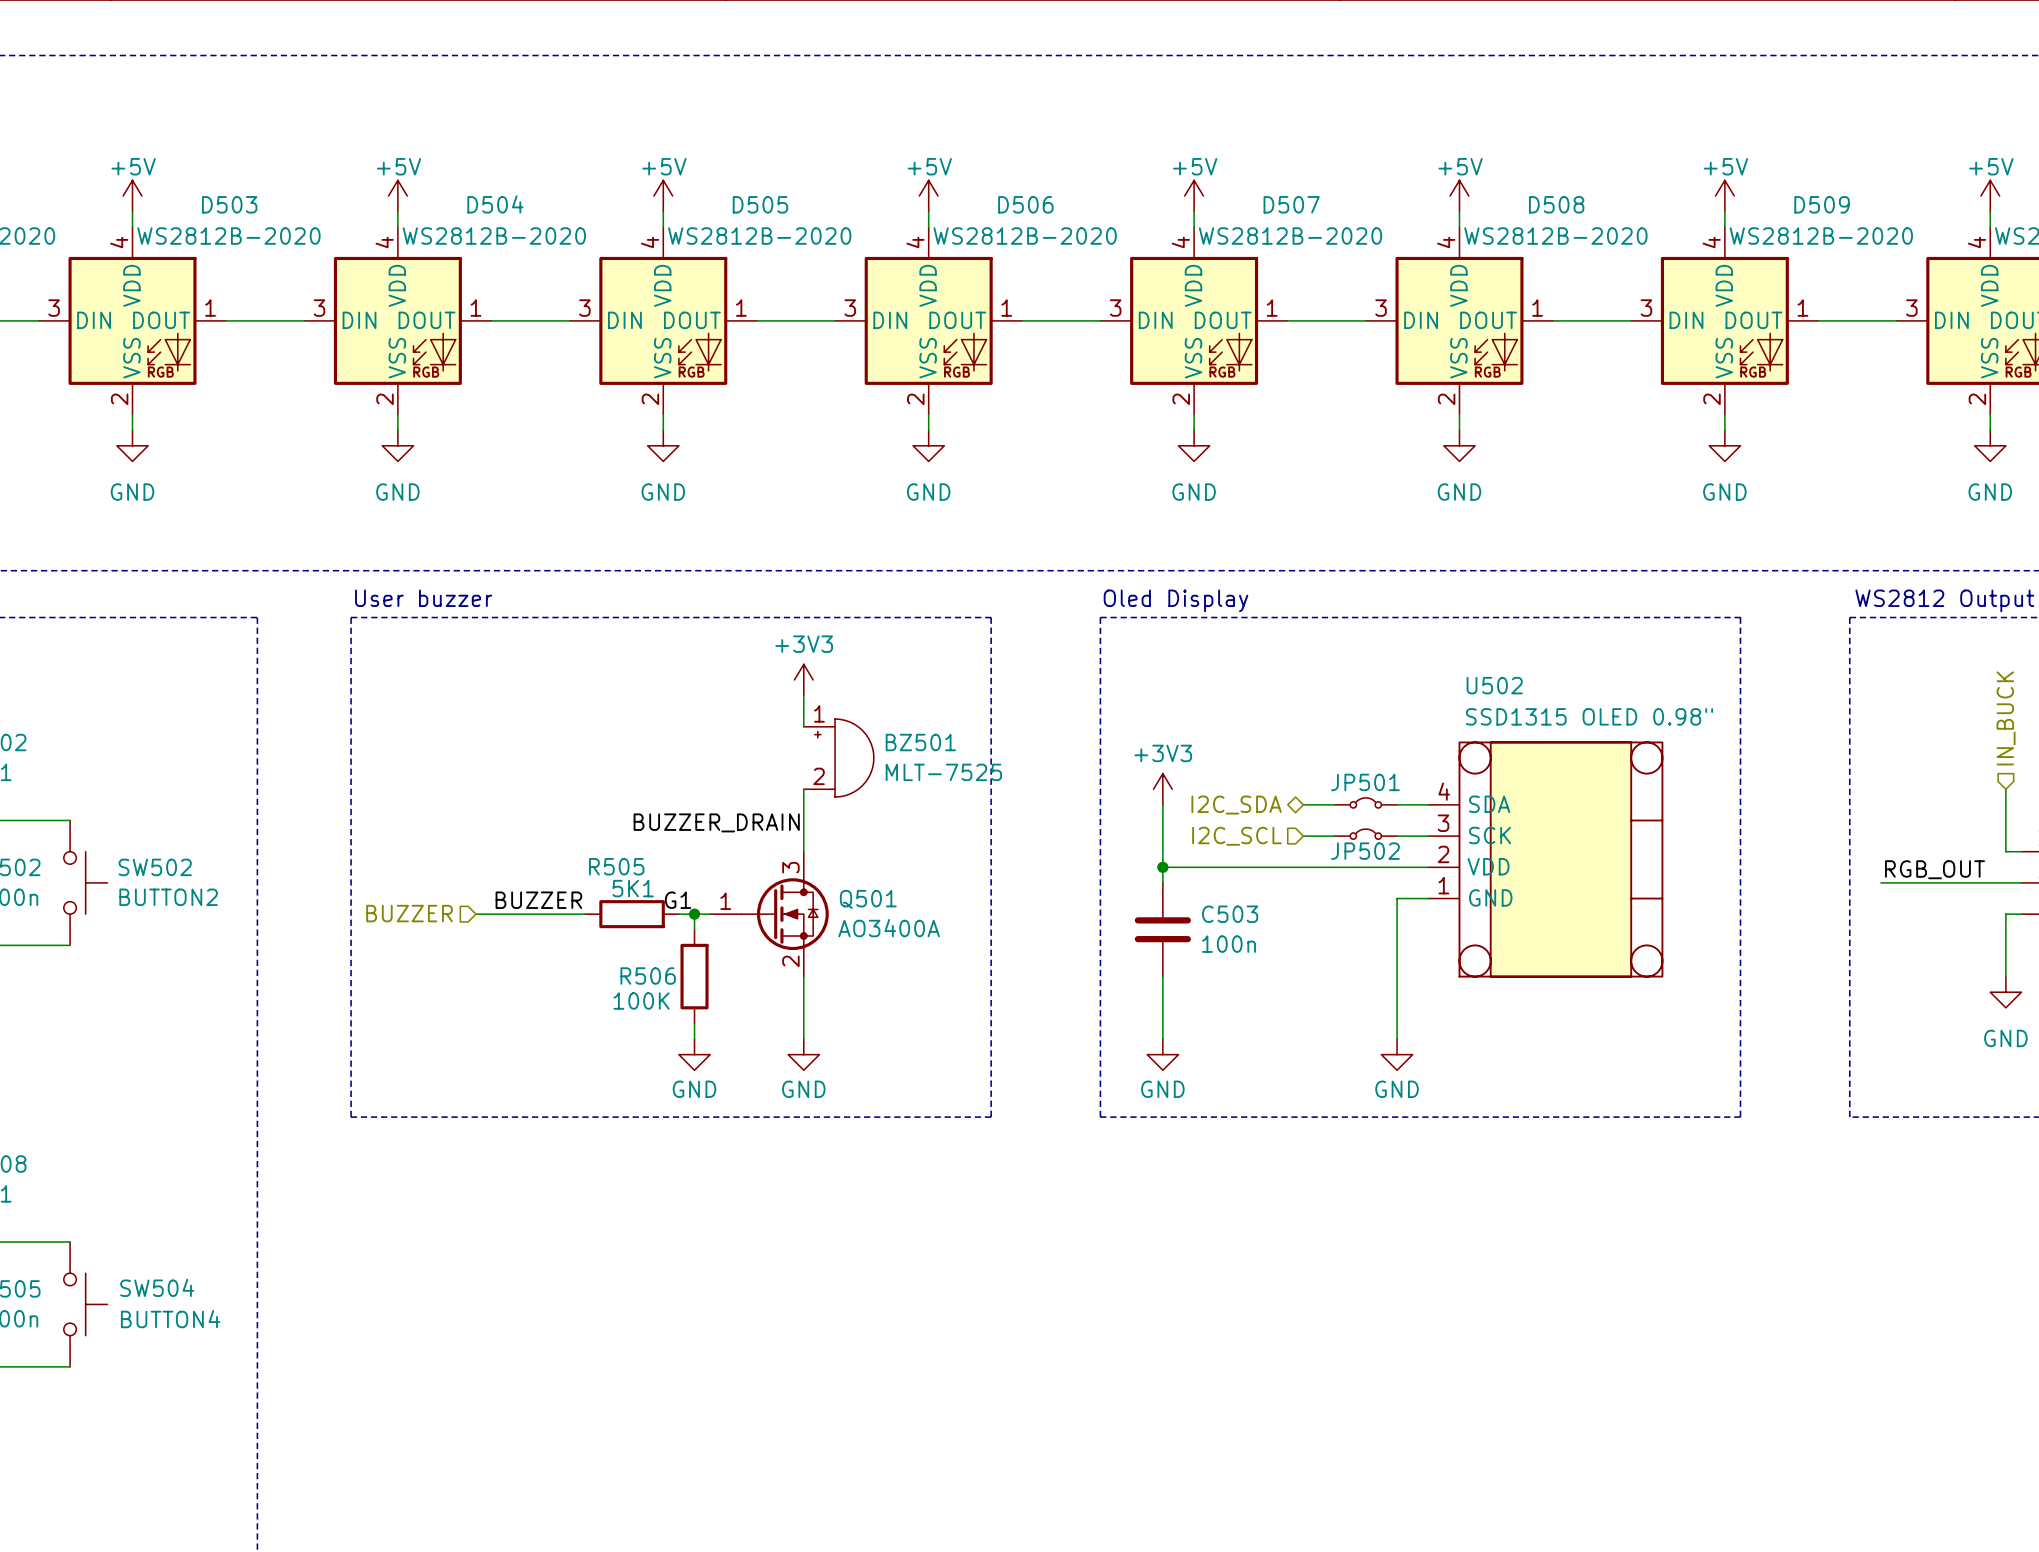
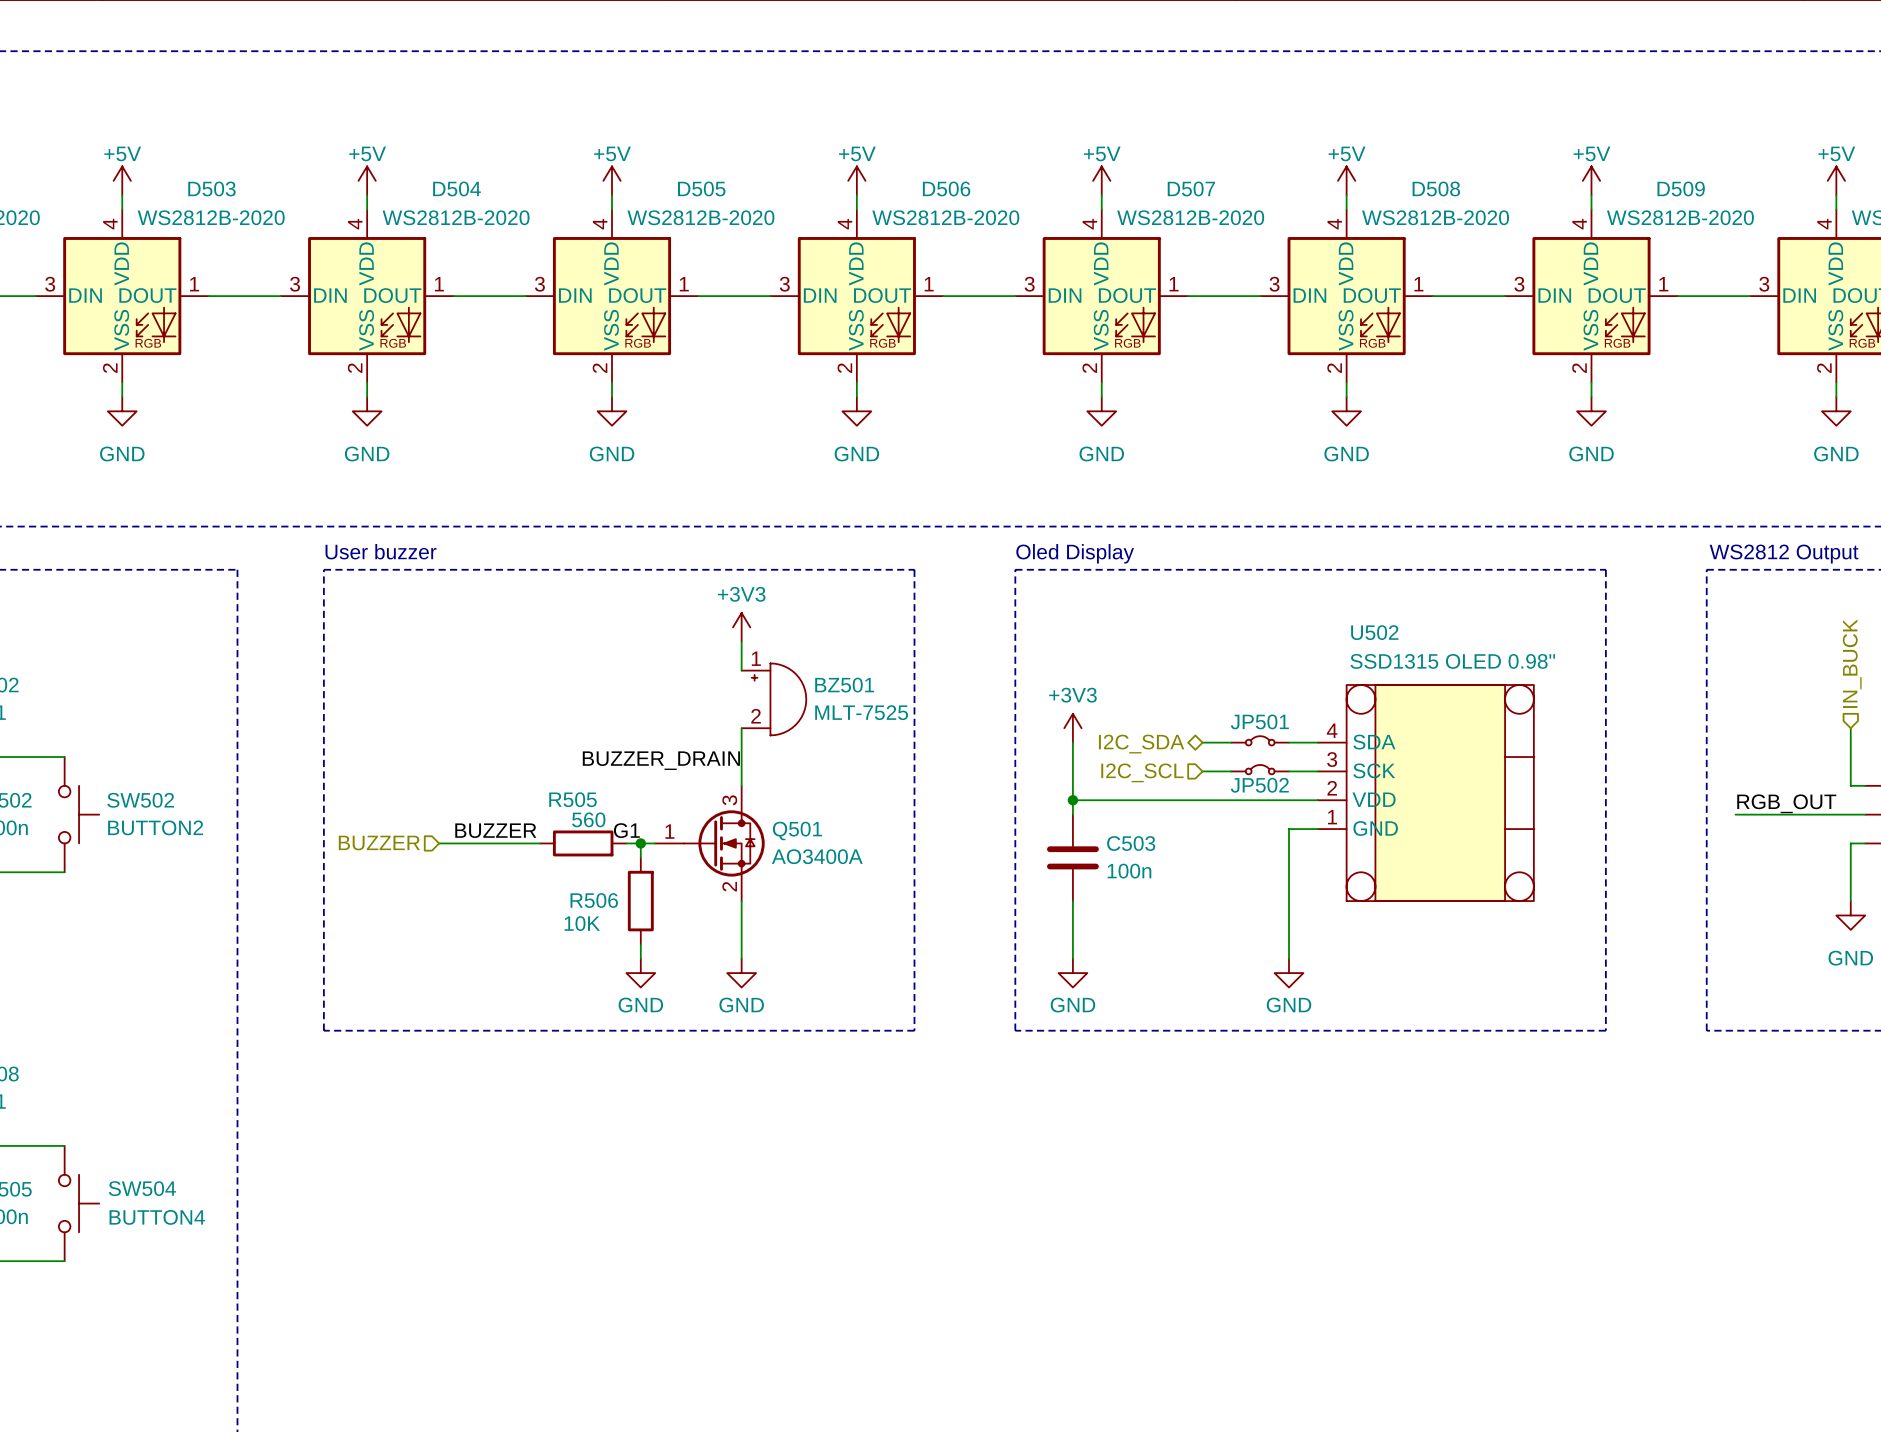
R505 value: 5K1 (633, 888) -> 560 (588, 819)
R506 value: 100K (641, 1000) -> 10K (582, 923)

